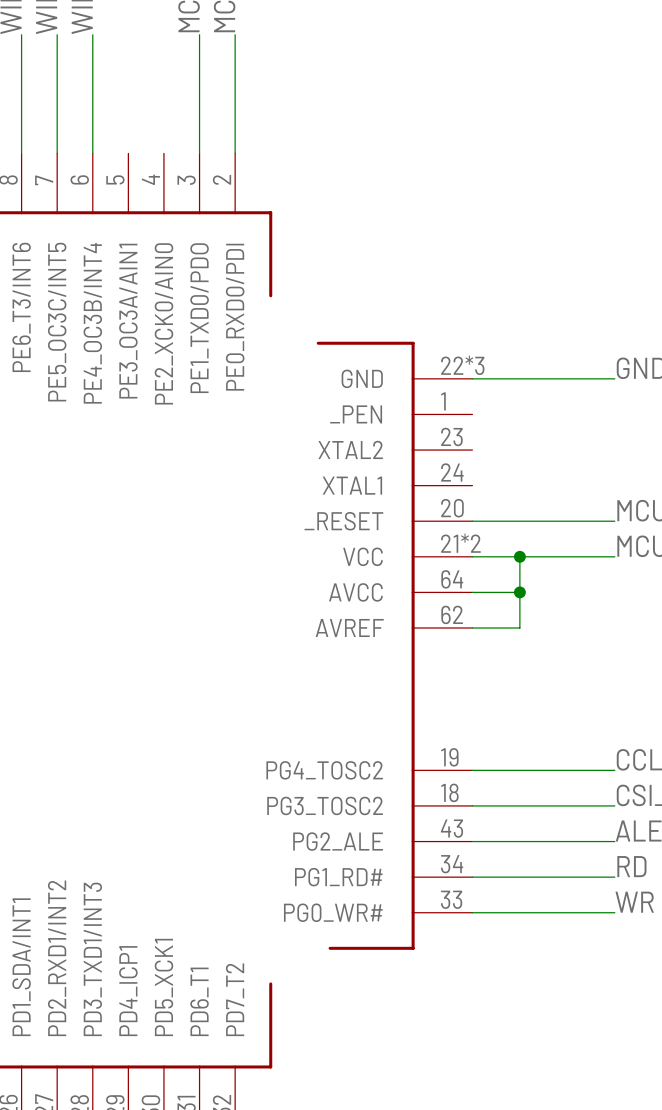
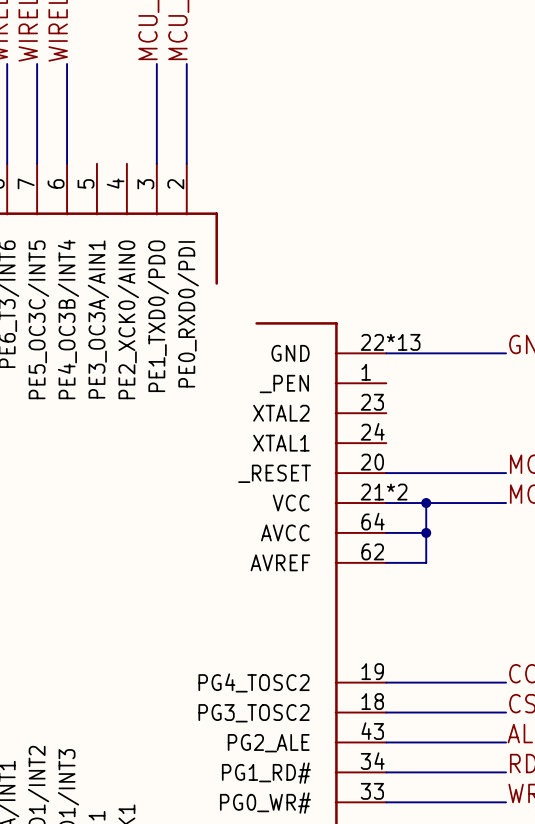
part pin number: 22*3 (462, 365) -> 22*13 (390, 342)

